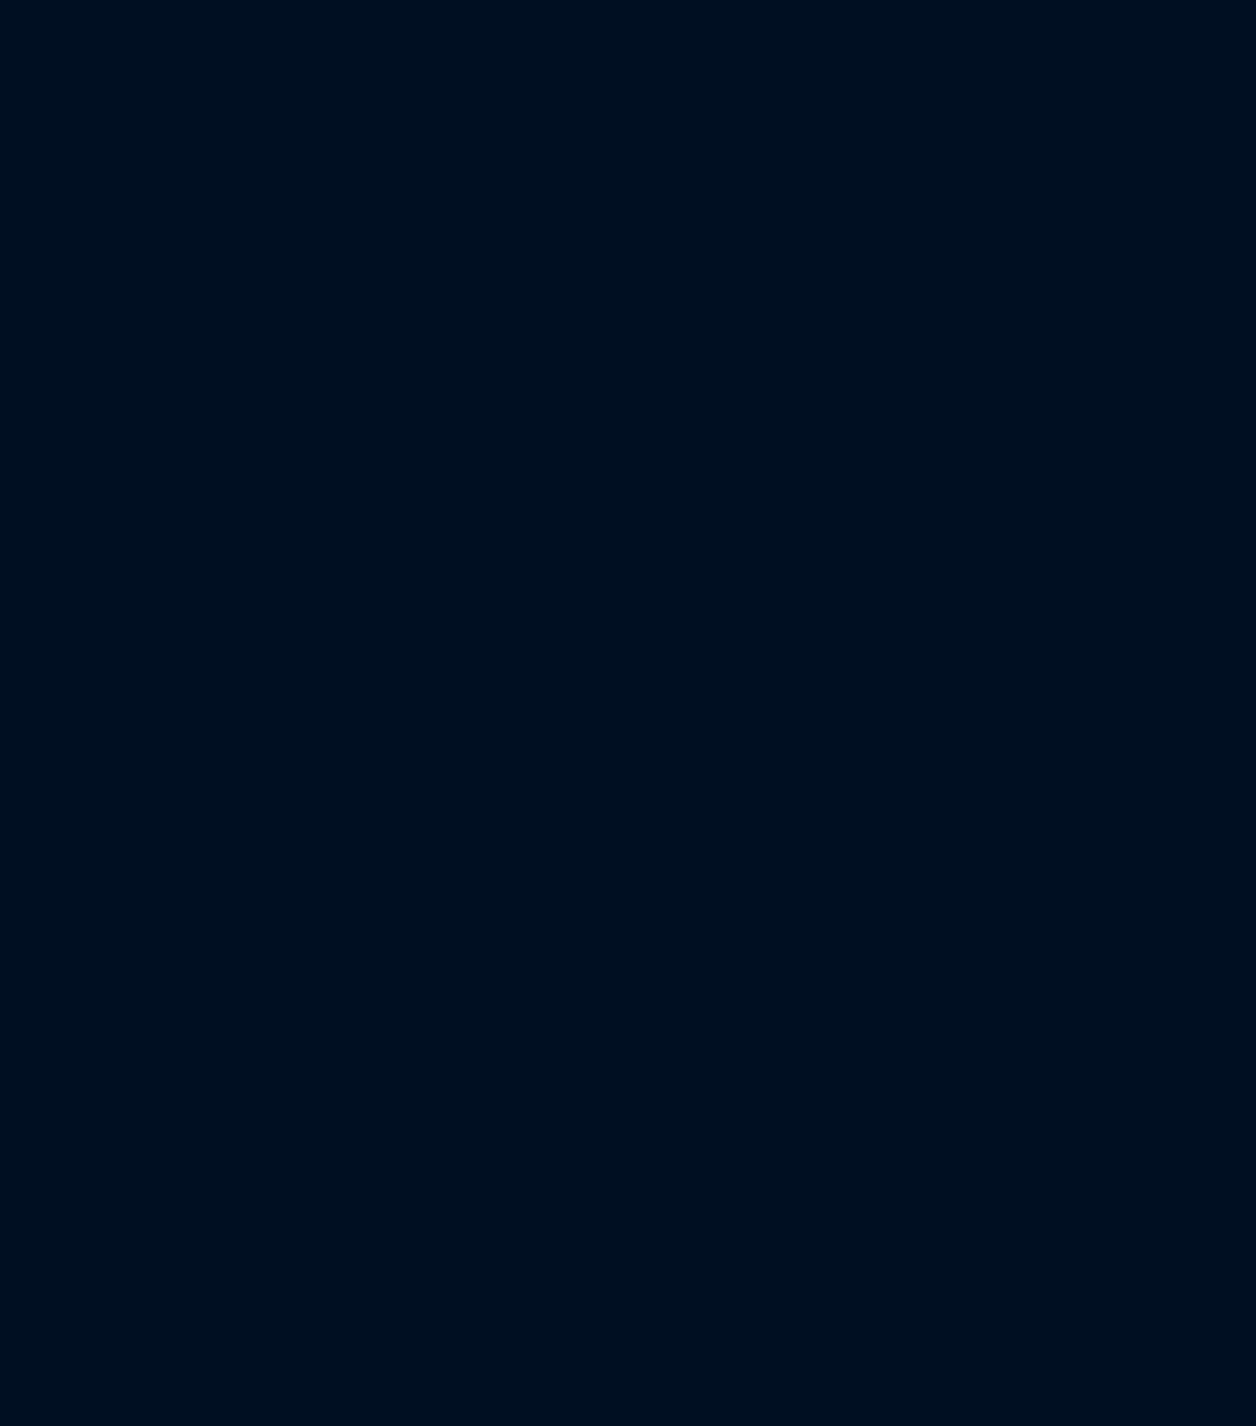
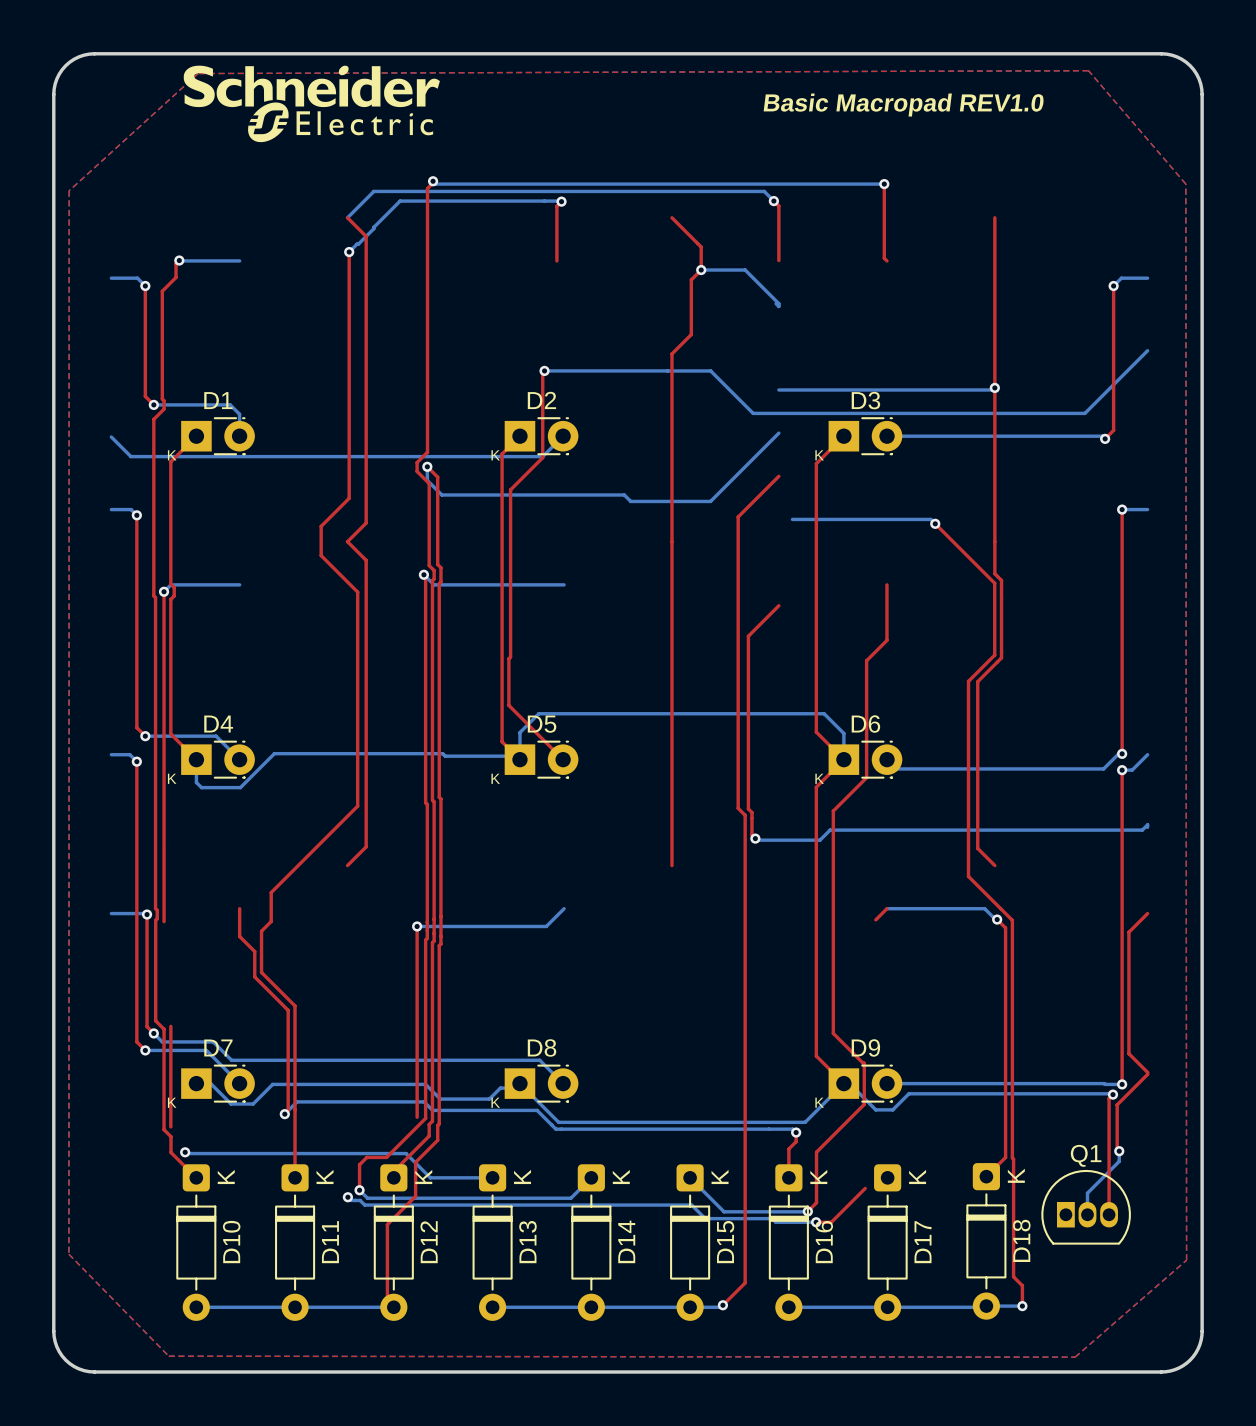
board edge: none -> (94, 53) (1161, 53) (1181, 59) (1193, 69) (1200, 83) (1202, 94) (1202, 1331) (1198, 1348) (1186, 1363) (1174, 1369) (1161, 1372) (94, 1372) (78, 1368) (62, 1356) (56, 1346) (53, 1331) (53, 94) (56, 78) (65, 65) (78, 56) (94, 53)
drawing: none -> [183, 65, 440, 143]
top zone outline: none -> (1088, 70) (1185, 184) (1186, 1260) (1075, 1357) (168, 1356) (68, 1254) (69, 190) (198, 73) (1088, 70)
text: none -> Basic Macropad REV1.0 (903, 105)
top track: none -> (433, 181) (427, 188) (427, 452)
bottom track: none -> (433, 181) (435, 184) (884, 184)
via: none -> (433, 181)
top track: none -> (884, 184) (884, 258) (886, 260)
via: none -> (884, 184)
top track: none -> (561, 201) (556, 206) (556, 260)
bottom track: none -> (561, 201) (400, 201) (349, 252)
via: none -> (561, 201)
top track: none -> (773, 201) (778, 206) (778, 260)
bottom track: none -> (773, 201) (764, 191) (373, 191) (347, 217)
via: none -> (773, 201)
top track: none -> (347, 217) (366, 236) (366, 523) (347, 541) (366, 560) (366, 846) (347, 865)
top track: none -> (671, 217) (701, 247) (701, 270) (691, 279) (691, 334) (671, 353) (671, 865)
top track: none -> (994, 217) (994, 573) (1001, 580) (1001, 657) (977, 681) (977, 848) (994, 865)
top track: none -> (349, 252) (349, 498) (321, 526) (321, 555) (357, 592) (357, 806) (271, 892) (271, 921) (261, 931) (261, 972) (295, 1005) (295, 1174) (291, 1177)
via: none -> (349, 252)
top track: none -> (179, 260) (176, 263) (176, 277) (162, 291) (162, 398) (164, 409) (153, 419) (155, 908) (157, 910) (155, 1020) (164, 1029) (164, 1129) (170, 1136) (170, 1152) (196, 1177)
bottom track: none -> (179, 260) (239, 260)
via: none -> (179, 260)
bottom track: none -> (701, 270) (745, 270) (778, 303) (778, 306) (776, 303)
via: none -> (701, 270)
bottom track: none -> (111, 278) (137, 278) (145, 286)
bottom track: none -> (1147, 278) (1121, 278) (1113, 286)
top track: none -> (145, 286) (145, 396) (153, 404)
via: none -> (145, 286)
top track: none -> (1113, 286) (1113, 430) (1105, 438)
via: none -> (1113, 286)
bottom track: none -> (1147, 350) (1084, 413) (753, 413) (710, 370) (544, 370)
top track: none -> (544, 370) (542, 372) (542, 457) (510, 489) (508, 705) (563, 759)
via: none -> (544, 370)
bottom track: none -> (994, 387) (992, 390) (778, 390)
via: none -> (994, 387)
bottom track: none -> (153, 404) (230, 404) (239, 414) (239, 436)
via: none -> (153, 404)
bottom track: none -> (778, 433) (710, 501) (630, 501) (624, 495) (441, 495) (427, 480) (427, 466)
top track: none -> (196, 436) (170, 461) (170, 584) (174, 587) (174, 596) (170, 599) (170, 734) (196, 759)
D1: none -> (218, 436)
top track: none -> (519, 436) (502, 454) (502, 741) (519, 759)
D2: none -> (541, 436)
bottom track: none -> (563, 436) (542, 456) (130, 456) (111, 437)
top track: none -> (843, 436) (816, 463) (816, 732) (843, 759) (816, 787) (816, 1056) (843, 1083)
D3: none -> (865, 436)
bottom track: none -> (887, 436) (1102, 436) (1105, 438)
via: none -> (1105, 438)
top track: none -> (427, 452) (417, 462) (417, 471) (429, 483) (429, 565) (434, 570) (432, 580) (432, 800) (434, 801) (432, 1121) (429, 1124) (429, 1136) (393, 1171) (393, 1177)
top track: none -> (427, 466) (437, 477) (437, 564) (440, 567) (440, 581) (439, 583) (439, 797) (440, 798) (439, 1124) (437, 1140) (415, 1162) (415, 1196) (387, 1224) (387, 1300) (393, 1307)
via: none -> (427, 466)
top track: none -> (778, 476) (738, 516) (738, 808) (745, 815) (745, 1282) (722, 1305)
bottom track: none -> (111, 509) (131, 509) (136, 515)
top track: none -> (1122, 509) (1122, 753)
bottom track: none -> (1122, 509) (1147, 509)
via: none -> (1122, 509)
top track: none -> (136, 515) (136, 727) (145, 736)
via: none -> (136, 515)
bottom track: none -> (792, 519) (930, 519) (935, 523)
top track: none -> (935, 523) (994, 583) (994, 655) (968, 681) (968, 876) (1012, 920) (1013, 1276) (1022, 1285) (1022, 1306)
via: none -> (935, 523)
top track: none -> (423, 574) (425, 576) (425, 802) (427, 804) (425, 1118) (386, 1157) (366, 1157) (359, 1164) (359, 1190)
bottom track: none -> (423, 574) (434, 584) (564, 584)
via: none -> (423, 574)
bottom track: none -> (239, 584) (170, 584) (164, 591)
top track: none -> (886, 584) (886, 640) (866, 660) (866, 777) (833, 811) (833, 1033) (864, 1063) (864, 1104) (816, 1152) (816, 1202) (807, 1211)
top track: none -> (164, 591) (164, 921)
via: none -> (164, 591)
top track: none -> (778, 605) (748, 636) (748, 808) (751, 812) (751, 835) (755, 838)
bottom track: none -> (145, 736) (216, 736) (239, 759)
via: none -> (145, 736)
bottom track: none -> (196, 753) (196, 782) (201, 787) (240, 787) (274, 753) (442, 753) (445, 756) (516, 756)
bottom track: none -> (1122, 753) (1118, 753) (1103, 768) (896, 768) (887, 759)
via: none -> (1122, 753)
bottom track: none -> (111, 754) (129, 754) (136, 761)
bottom track: none -> (1147, 754) (1132, 770) (1122, 770)
D4: none -> (218, 759)
bottom track: none -> (519, 759) (519, 732) (538, 713) (824, 713) (843, 733) (843, 759)
D5: none -> (541, 759)
D6: none -> (865, 759)
top track: none -> (136, 761) (136, 1041) (145, 1050)
via: none -> (136, 761)
top track: none -> (1122, 770) (1122, 1084)
via: none -> (1122, 770)
bottom track: none -> (1147, 827) (1147, 824) (1142, 830) (830, 830) (820, 840) (756, 840) (755, 838)
via: none -> (755, 838)
top track: none -> (239, 908) (239, 936) (254, 951) (254, 976) (288, 1010) (288, 1110) (284, 1114)
bottom track: none -> (564, 908) (546, 926) (417, 926)
top track: none -> (886, 908) (875, 919)
bottom track: none -> (886, 908) (984, 908) (997, 919)
bottom track: none -> (111, 913) (147, 914)
top track: none -> (1147, 913) (1128, 932) (1128, 1053) (1147, 1074) (1117, 1104) (1117, 1149) (1119, 1151)
top track: none -> (147, 914) (147, 1026) (153, 1033)
via: none -> (147, 914)
top track: none -> (997, 919) (1005, 927) (1005, 1157) (986, 1176)
via: none -> (997, 919)
top track: none -> (417, 926) (417, 1117)
via: none -> (417, 926)
top track: none -> (170, 1026) (170, 1126)
bottom track: none -> (153, 1033) (162, 1041) (213, 1041) (231, 1060) (539, 1060) (563, 1083)
via: none -> (153, 1033)
bottom track: none -> (145, 1050) (206, 1050) (239, 1083)
via: none -> (145, 1050)
bottom track: none -> (196, 1083) (210, 1083) (231, 1104) (253, 1104) (272, 1084) (425, 1084) (440, 1099) (489, 1099) (500, 1088) (515, 1088) (519, 1083) (558, 1122) (805, 1122) (843, 1083) (849, 1083) (875, 1109) (892, 1109) (908, 1093) (1112, 1094)
D7: none -> (218, 1083)
D8: none -> (541, 1083)
D9: none -> (865, 1083)
bottom track: none -> (887, 1083) (1122, 1084)
via: none -> (1122, 1084)
top track: none -> (1112, 1094) (1109, 1098) (1109, 1214)
via: none -> (1112, 1094)
bottom track: none -> (284, 1114) (297, 1101) (424, 1101) (432, 1110) (537, 1110) (555, 1129) (792, 1129) (796, 1132)
via: none -> (284, 1114)
top track: none -> (796, 1132) (796, 1141) (788, 1149) (788, 1177)
via: none -> (796, 1132)
bottom track: none -> (1119, 1151) (1119, 1161) (1087, 1193) (1087, 1214)
via: none -> (1119, 1151)
bottom track: none -> (185, 1152) (406, 1153) (430, 1177) (492, 1177)
via: none -> (185, 1152)
bottom track: none -> (591, 1177) (570, 1198) (367, 1198) (359, 1190)
bottom track: none -> (690, 1177) (724, 1211) (807, 1211)
top track: none -> (865, 1188) (831, 1222) (816, 1222)
via: none -> (359, 1190)
bottom track: none -> (347, 1197) (351, 1200) (360, 1200) (364, 1205) (691, 1205) (705, 1218) (772, 1218) (775, 1222) (816, 1222)
via: none -> (347, 1197)
Q1: none -> (1086, 1207)
via: none -> (807, 1211)
via: none -> (816, 1222)
D18: none -> (986, 1241)
D10: none -> (196, 1242)
D11: none -> (295, 1242)
D12: none -> (393, 1242)
D13: none -> (492, 1242)
D14: none -> (591, 1242)
D15: none -> (690, 1242)
D16: none -> (788, 1242)
D17: none -> (887, 1242)
bottom track: none -> (722, 1305) (720, 1307) (492, 1307)
via: none -> (722, 1305)
bottom track: none -> (1022, 1306) (788, 1307) (790, 1309)
via: none -> (1022, 1306)
bottom track: none -> (196, 1307) (393, 1307)

